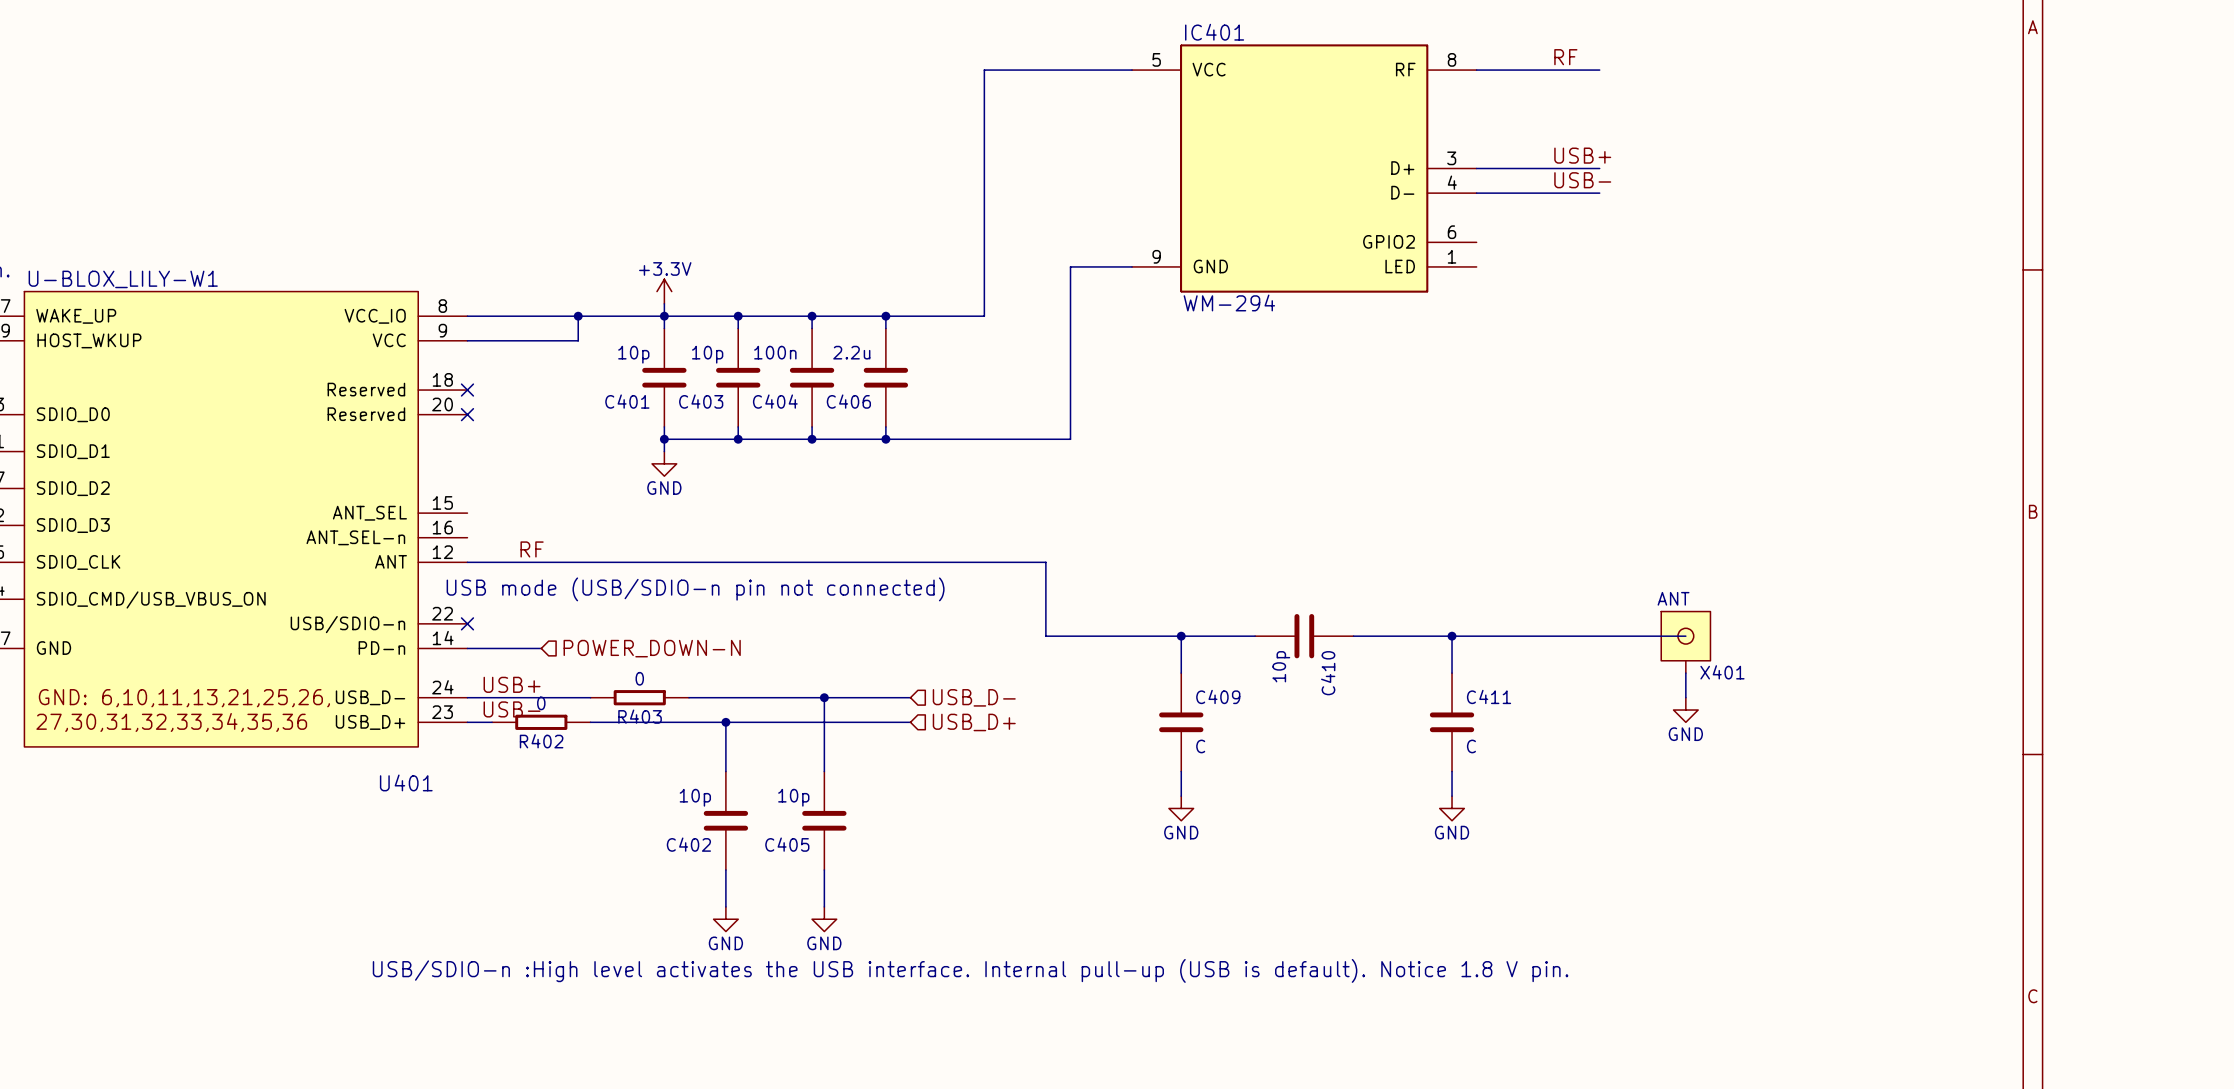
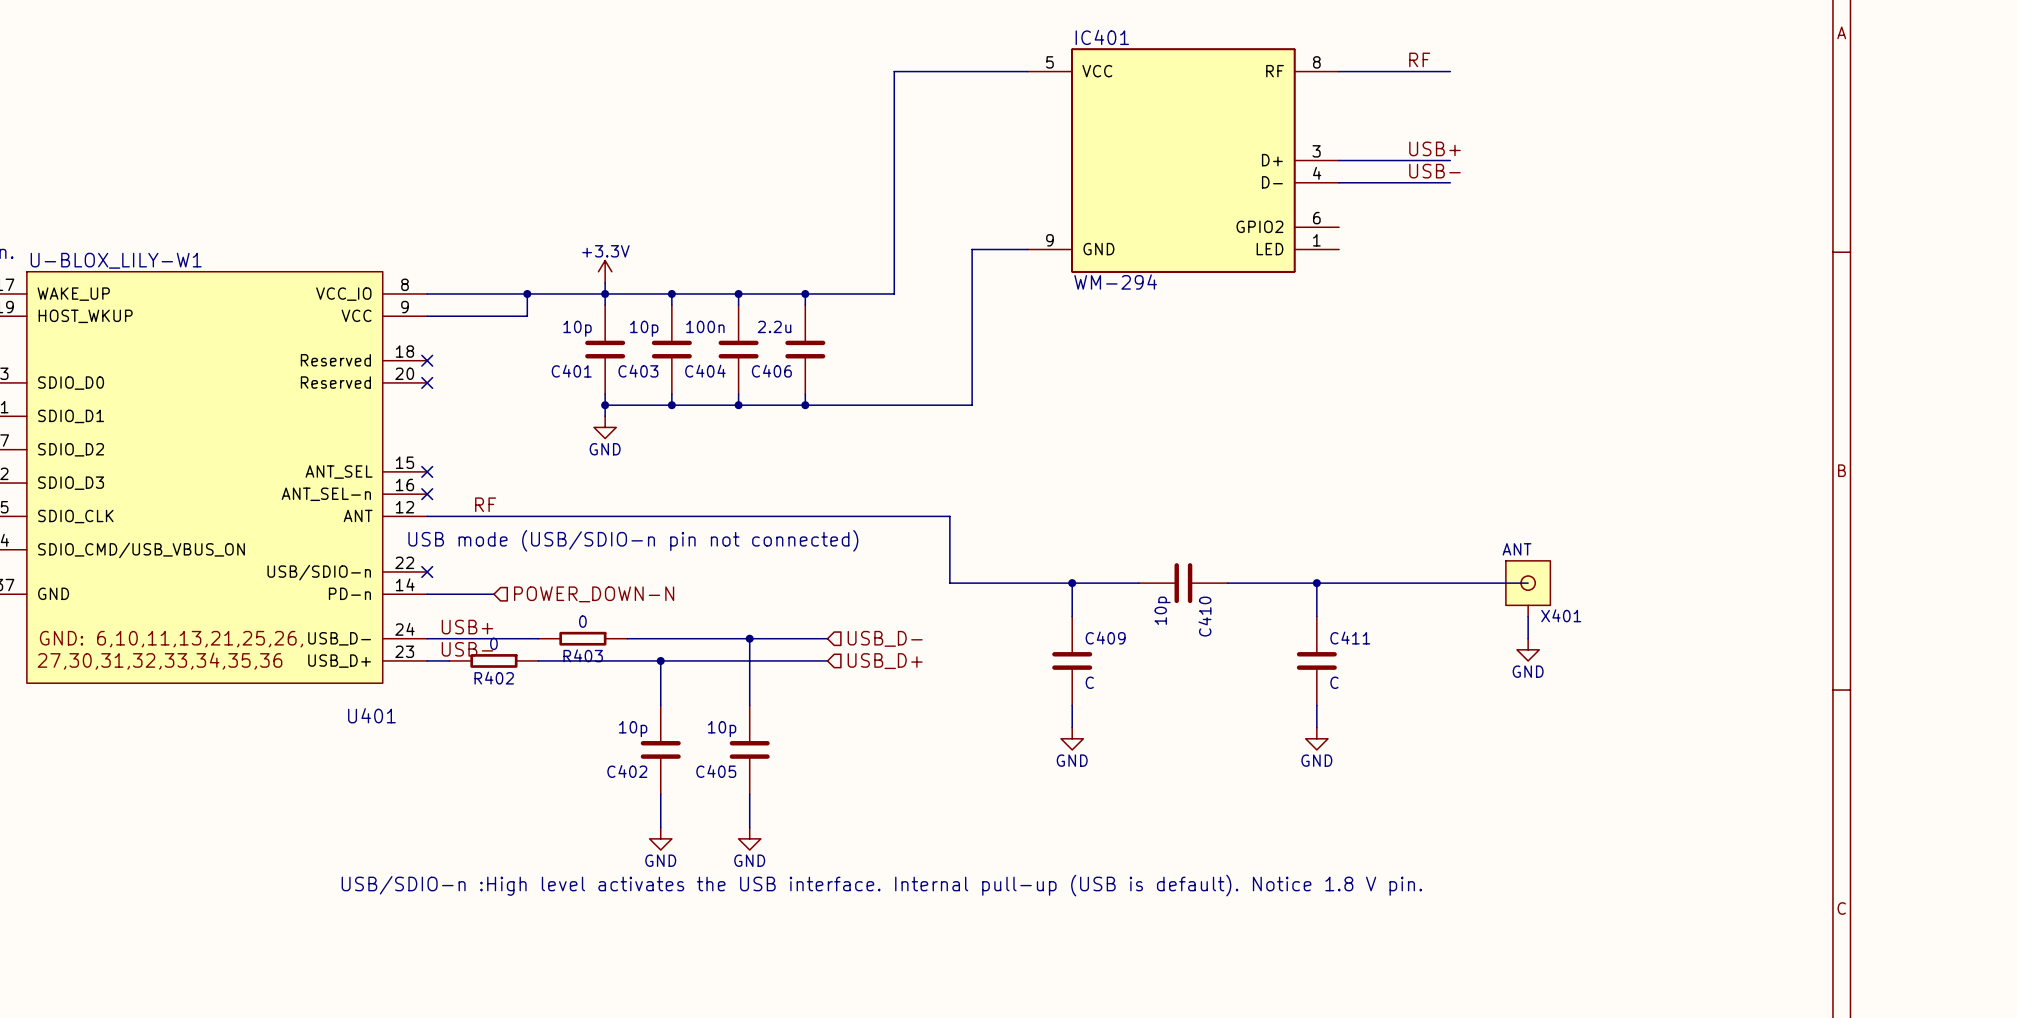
no-connect mark: none -> (427, 471)
no-connect mark: none -> (427, 494)

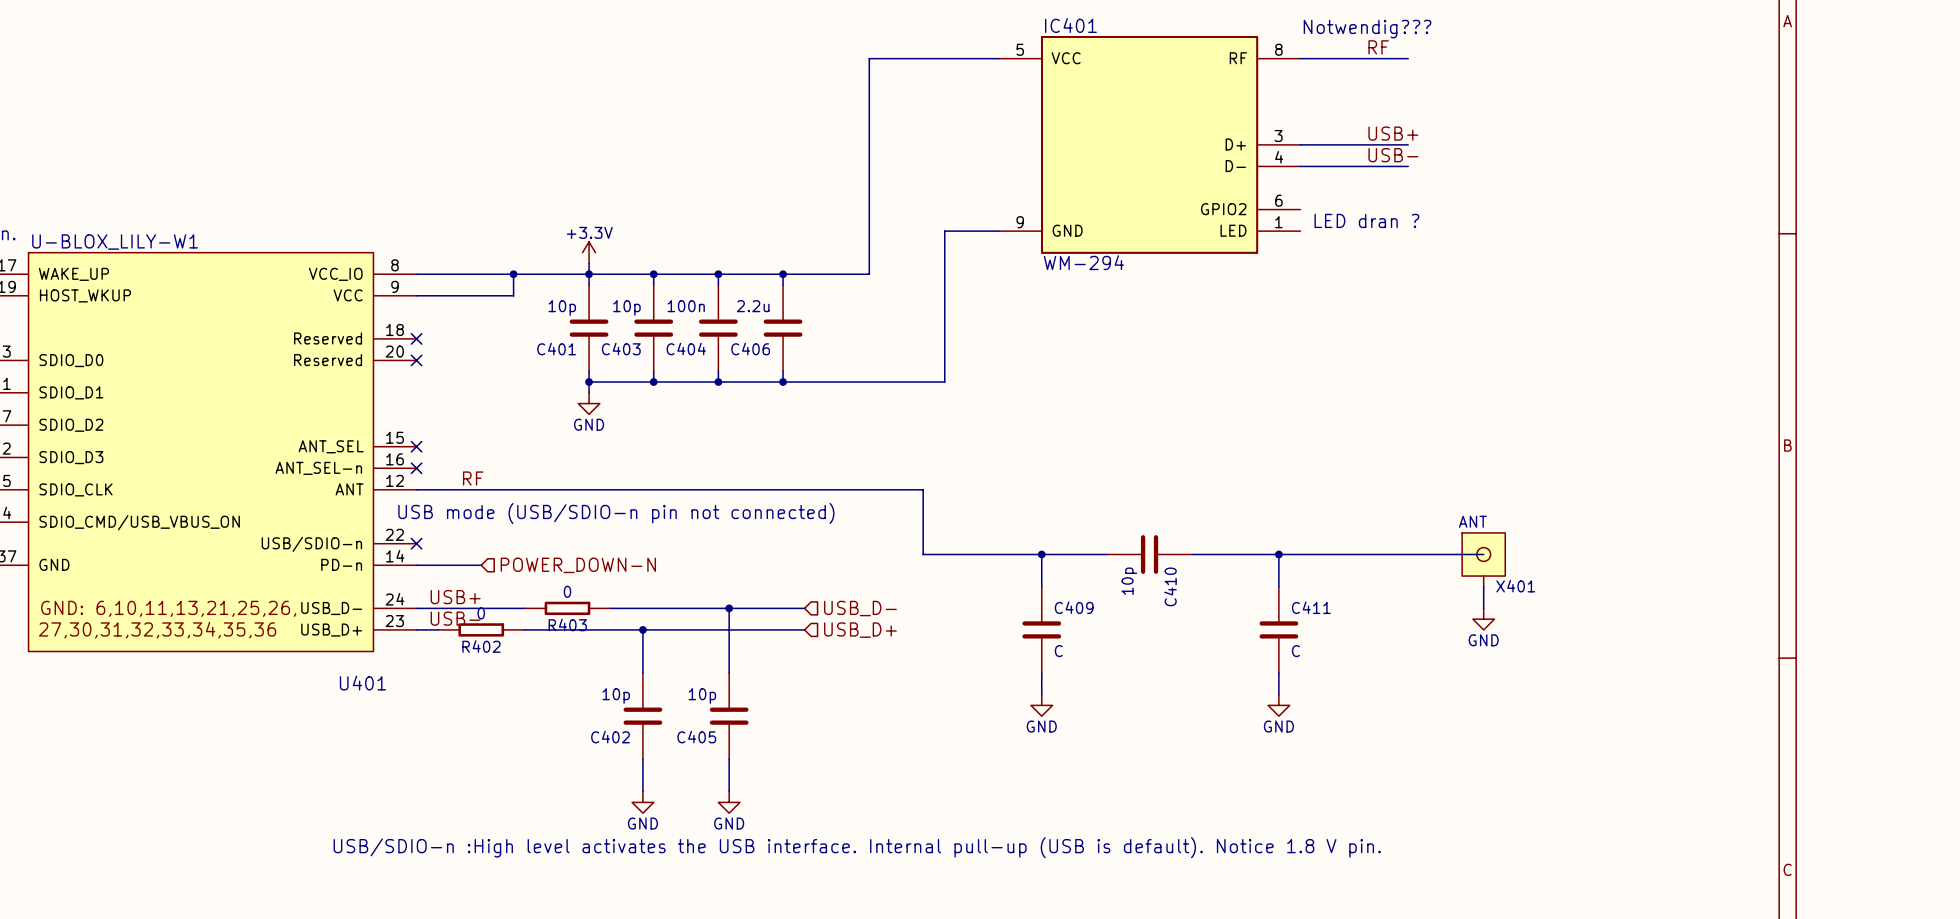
text: none -> Notwendig??? (1367, 29)
text: none -> LED dran ? (1366, 220)

